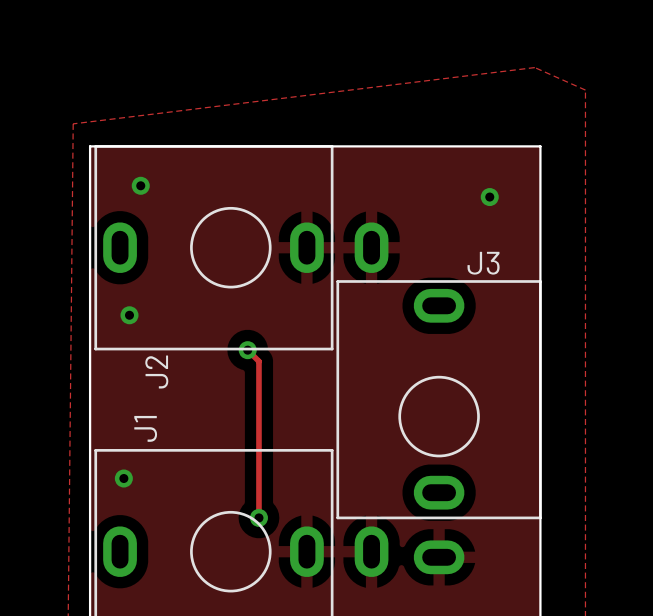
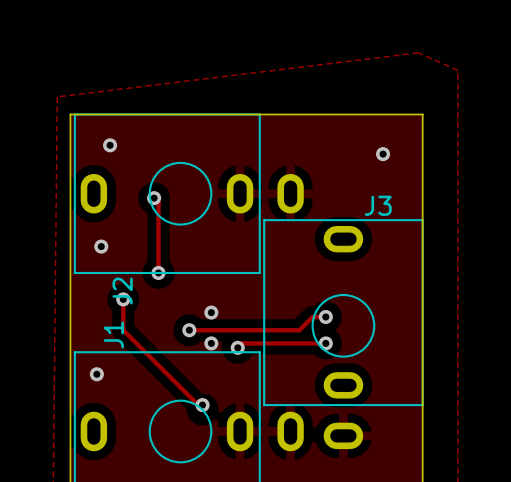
track: none -> (154, 198) (158, 202) (158, 272)
via: none -> (154, 198)
via: none -> (158, 272)
track: (247, 350) (258, 361) (258, 517) -> none
via: (247, 350) -> none
track: none -> (123, 299) (123, 330) (202, 409)
via: none -> (123, 299)
via: none -> (211, 312)
track: none -> (325, 317) (312, 317) (299, 330) (189, 330)
via: none -> (325, 317)
via: none -> (189, 330)
via: none -> (211, 343)
track: none -> (325, 343) (242, 343) (237, 347)
via: none -> (325, 343)
via: none -> (237, 347)

